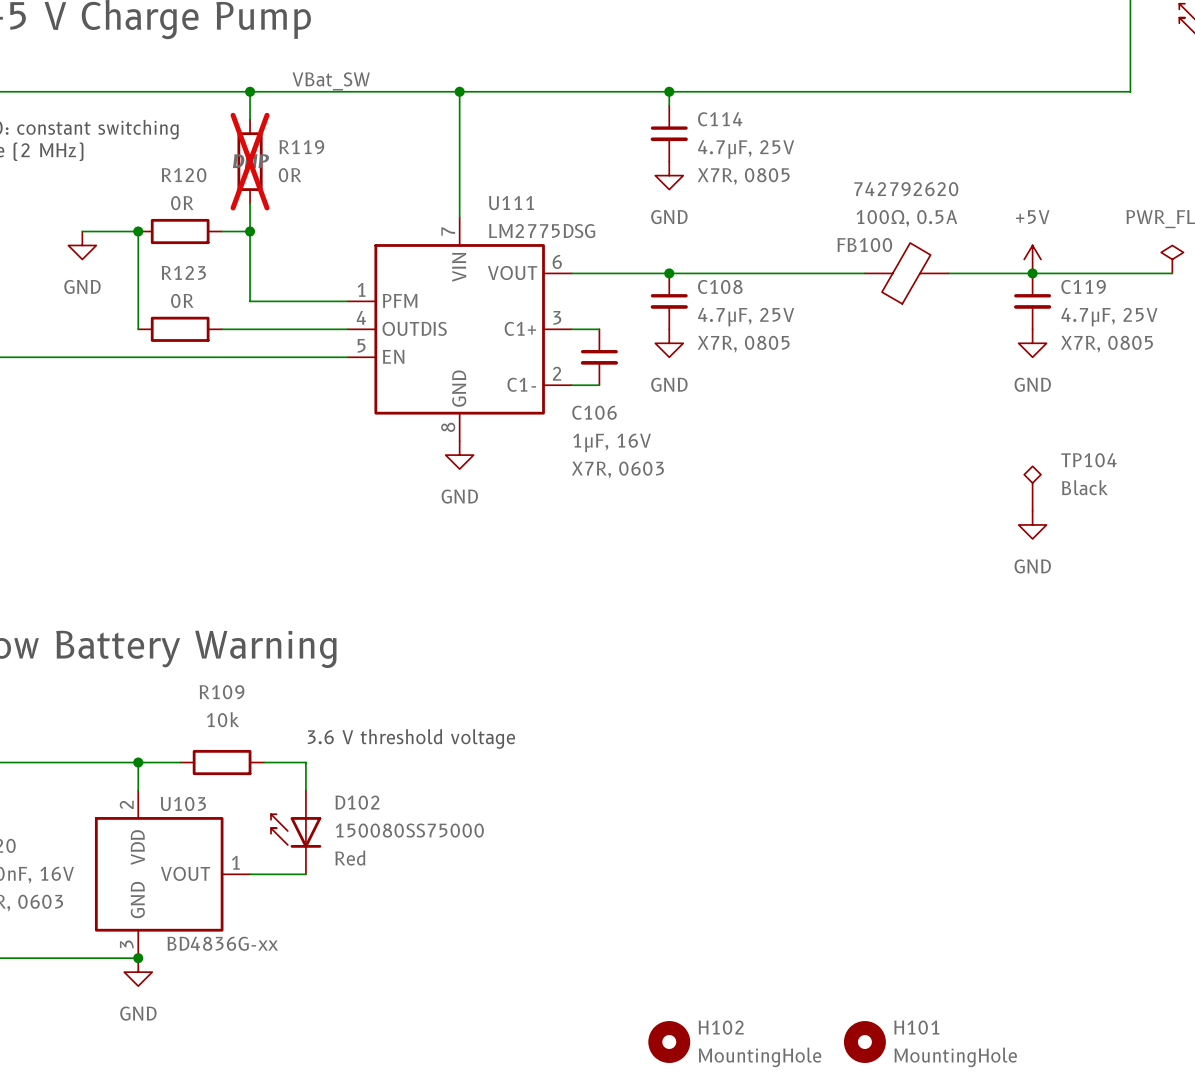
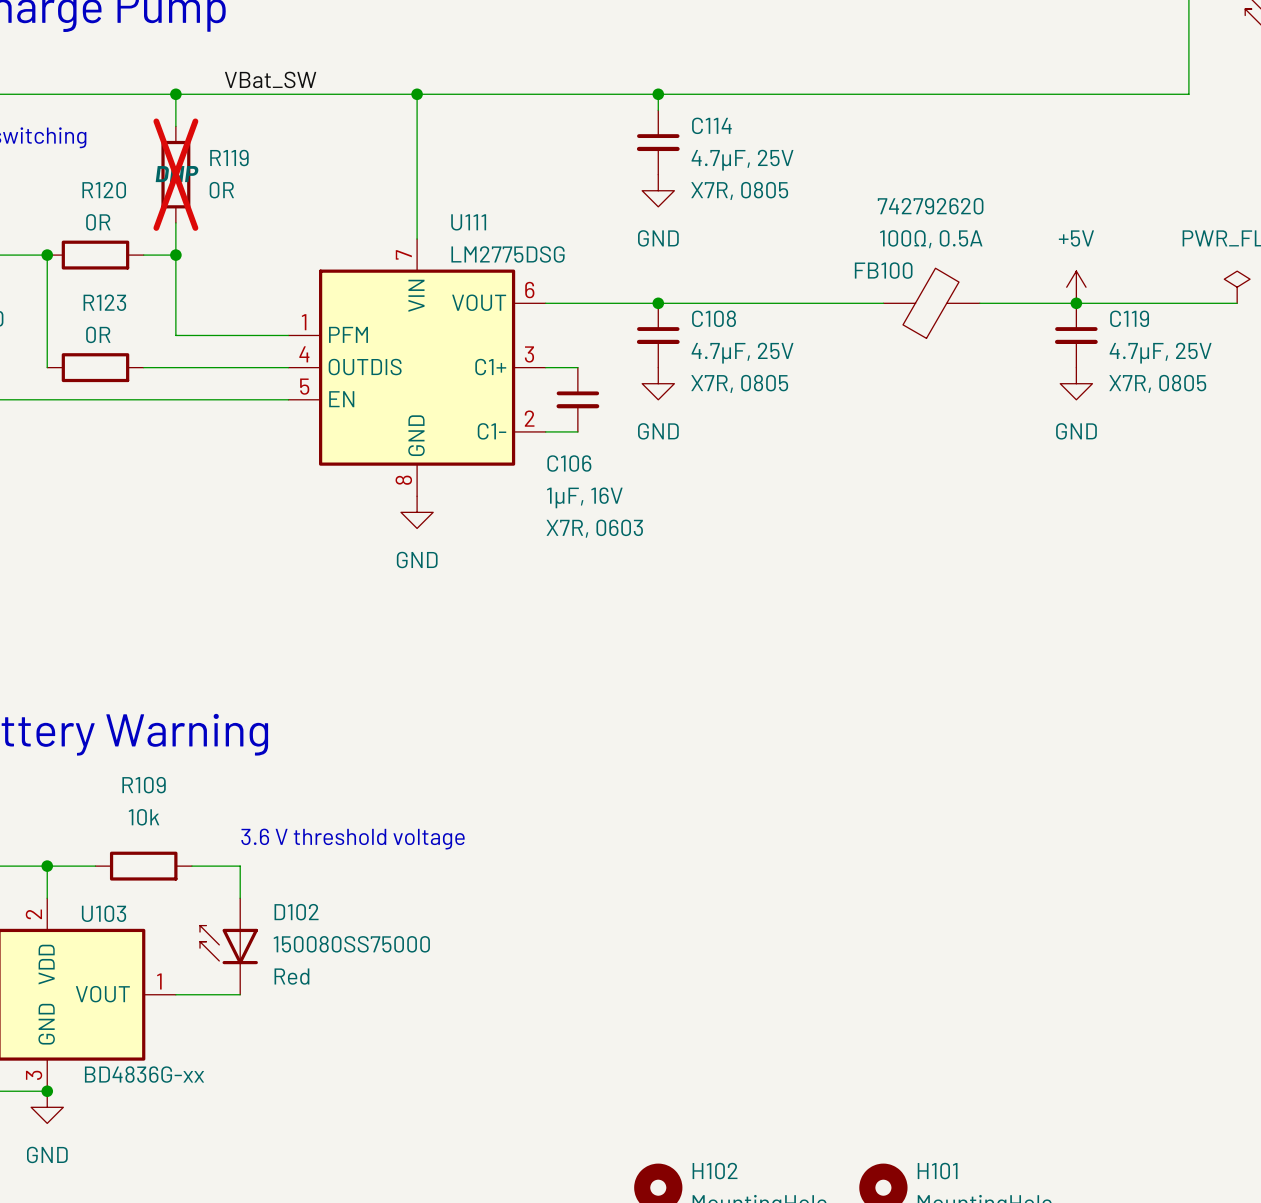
TP104: (1032, 488) -> none
power symbol: GND (1032, 524) -> none

